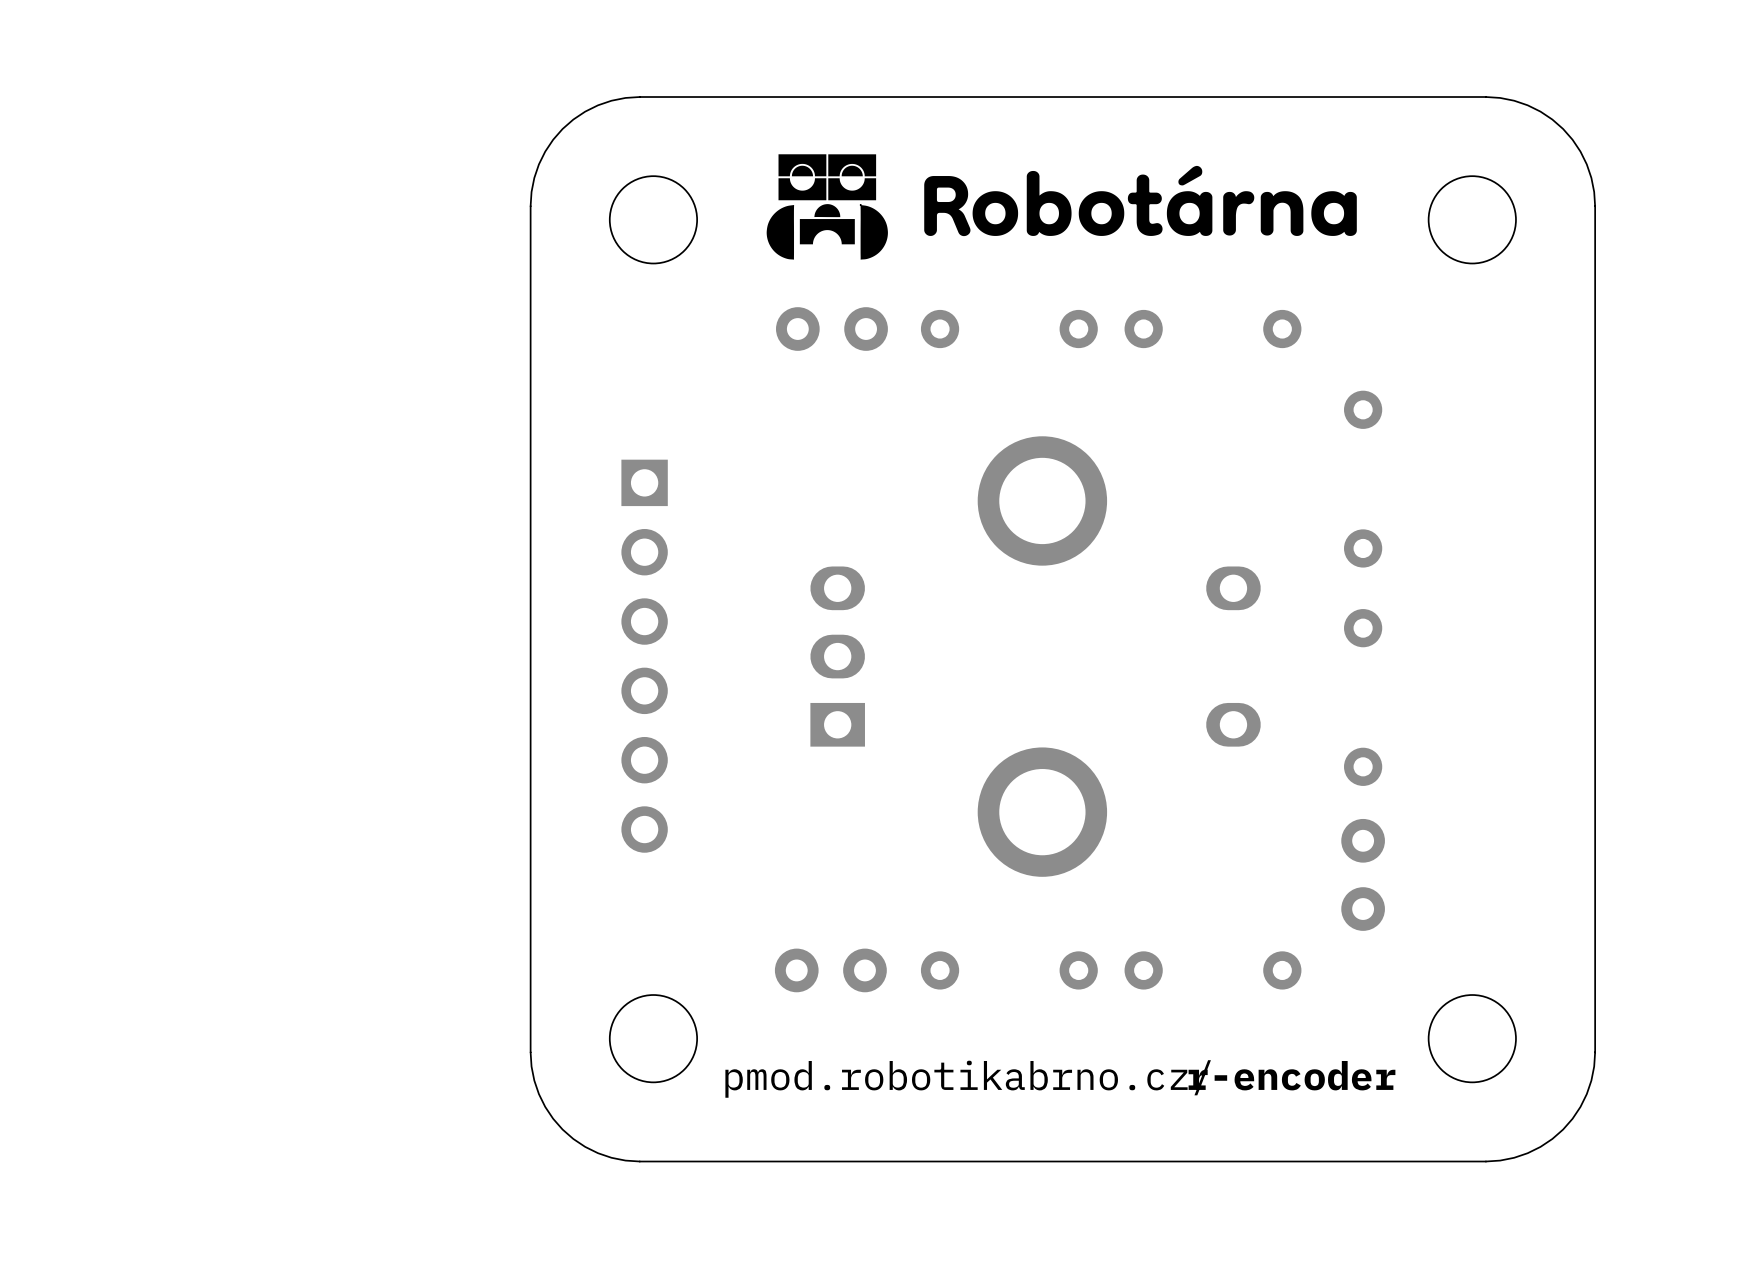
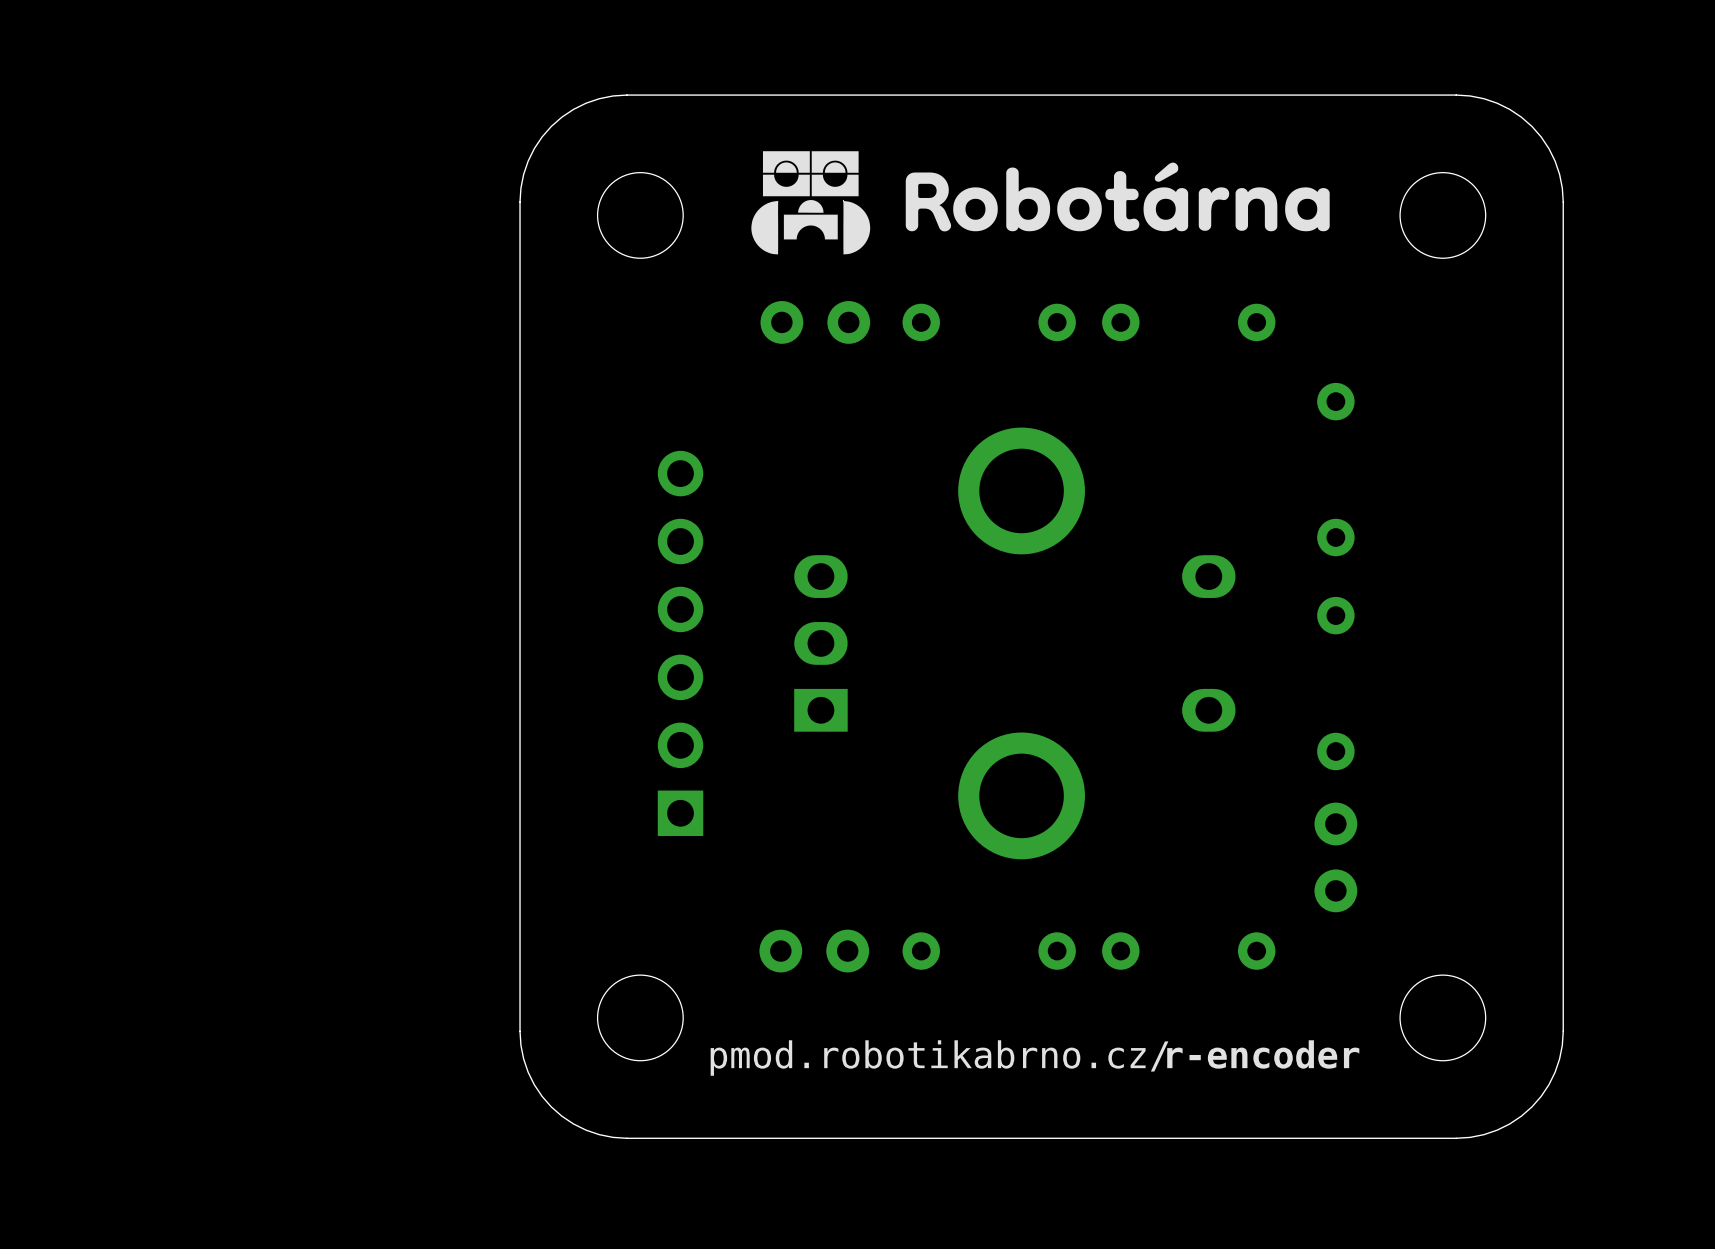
part rotation: 0° (644, 656) -> 180° (680, 643)

